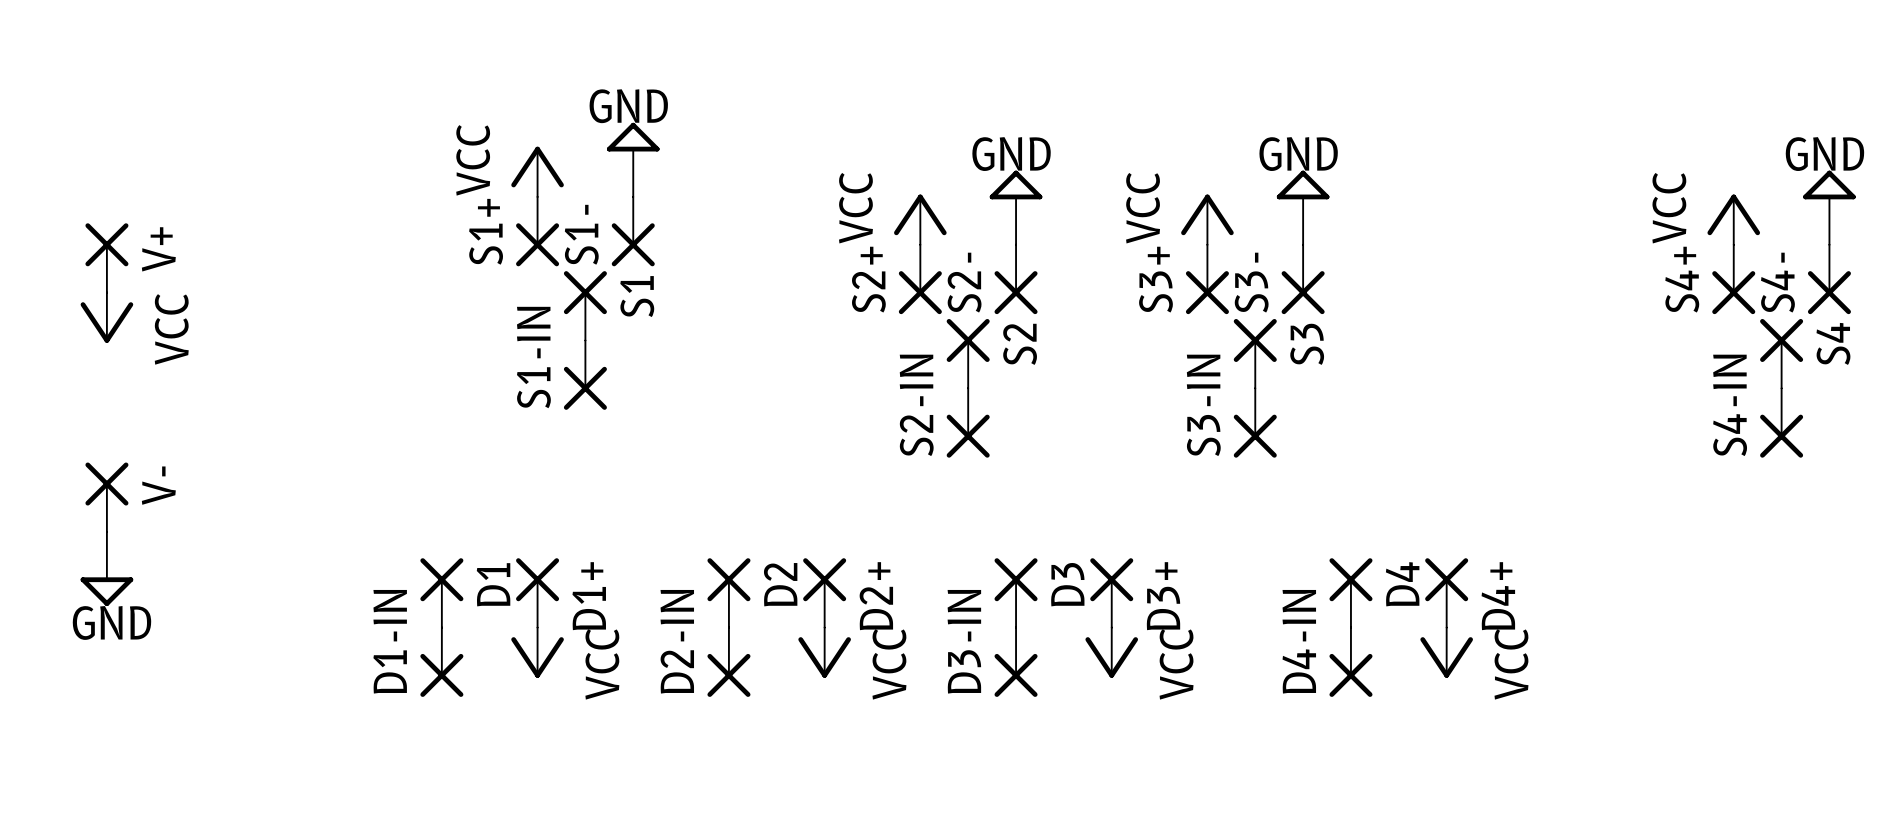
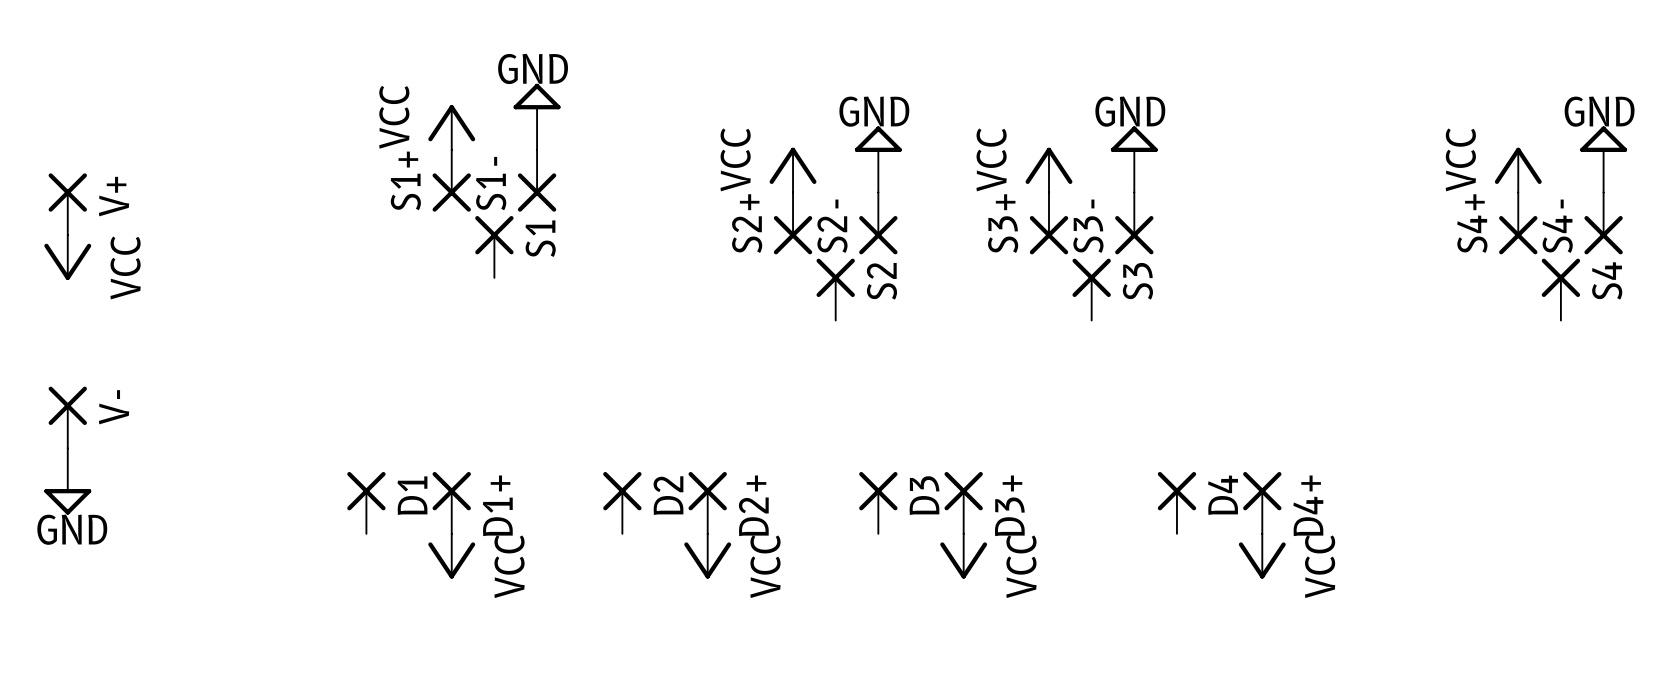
S1-IN: (585, 375) -> none
S2-IN: (968, 423) -> none
S3-IN: (1255, 423) -> none
S4-IN: (1781, 423) -> none
D1-IN: (441, 662) -> none
D2-IN: (728, 662) -> none
D3-IN: (1016, 662) -> none
D4-IN: (1350, 662) -> none

